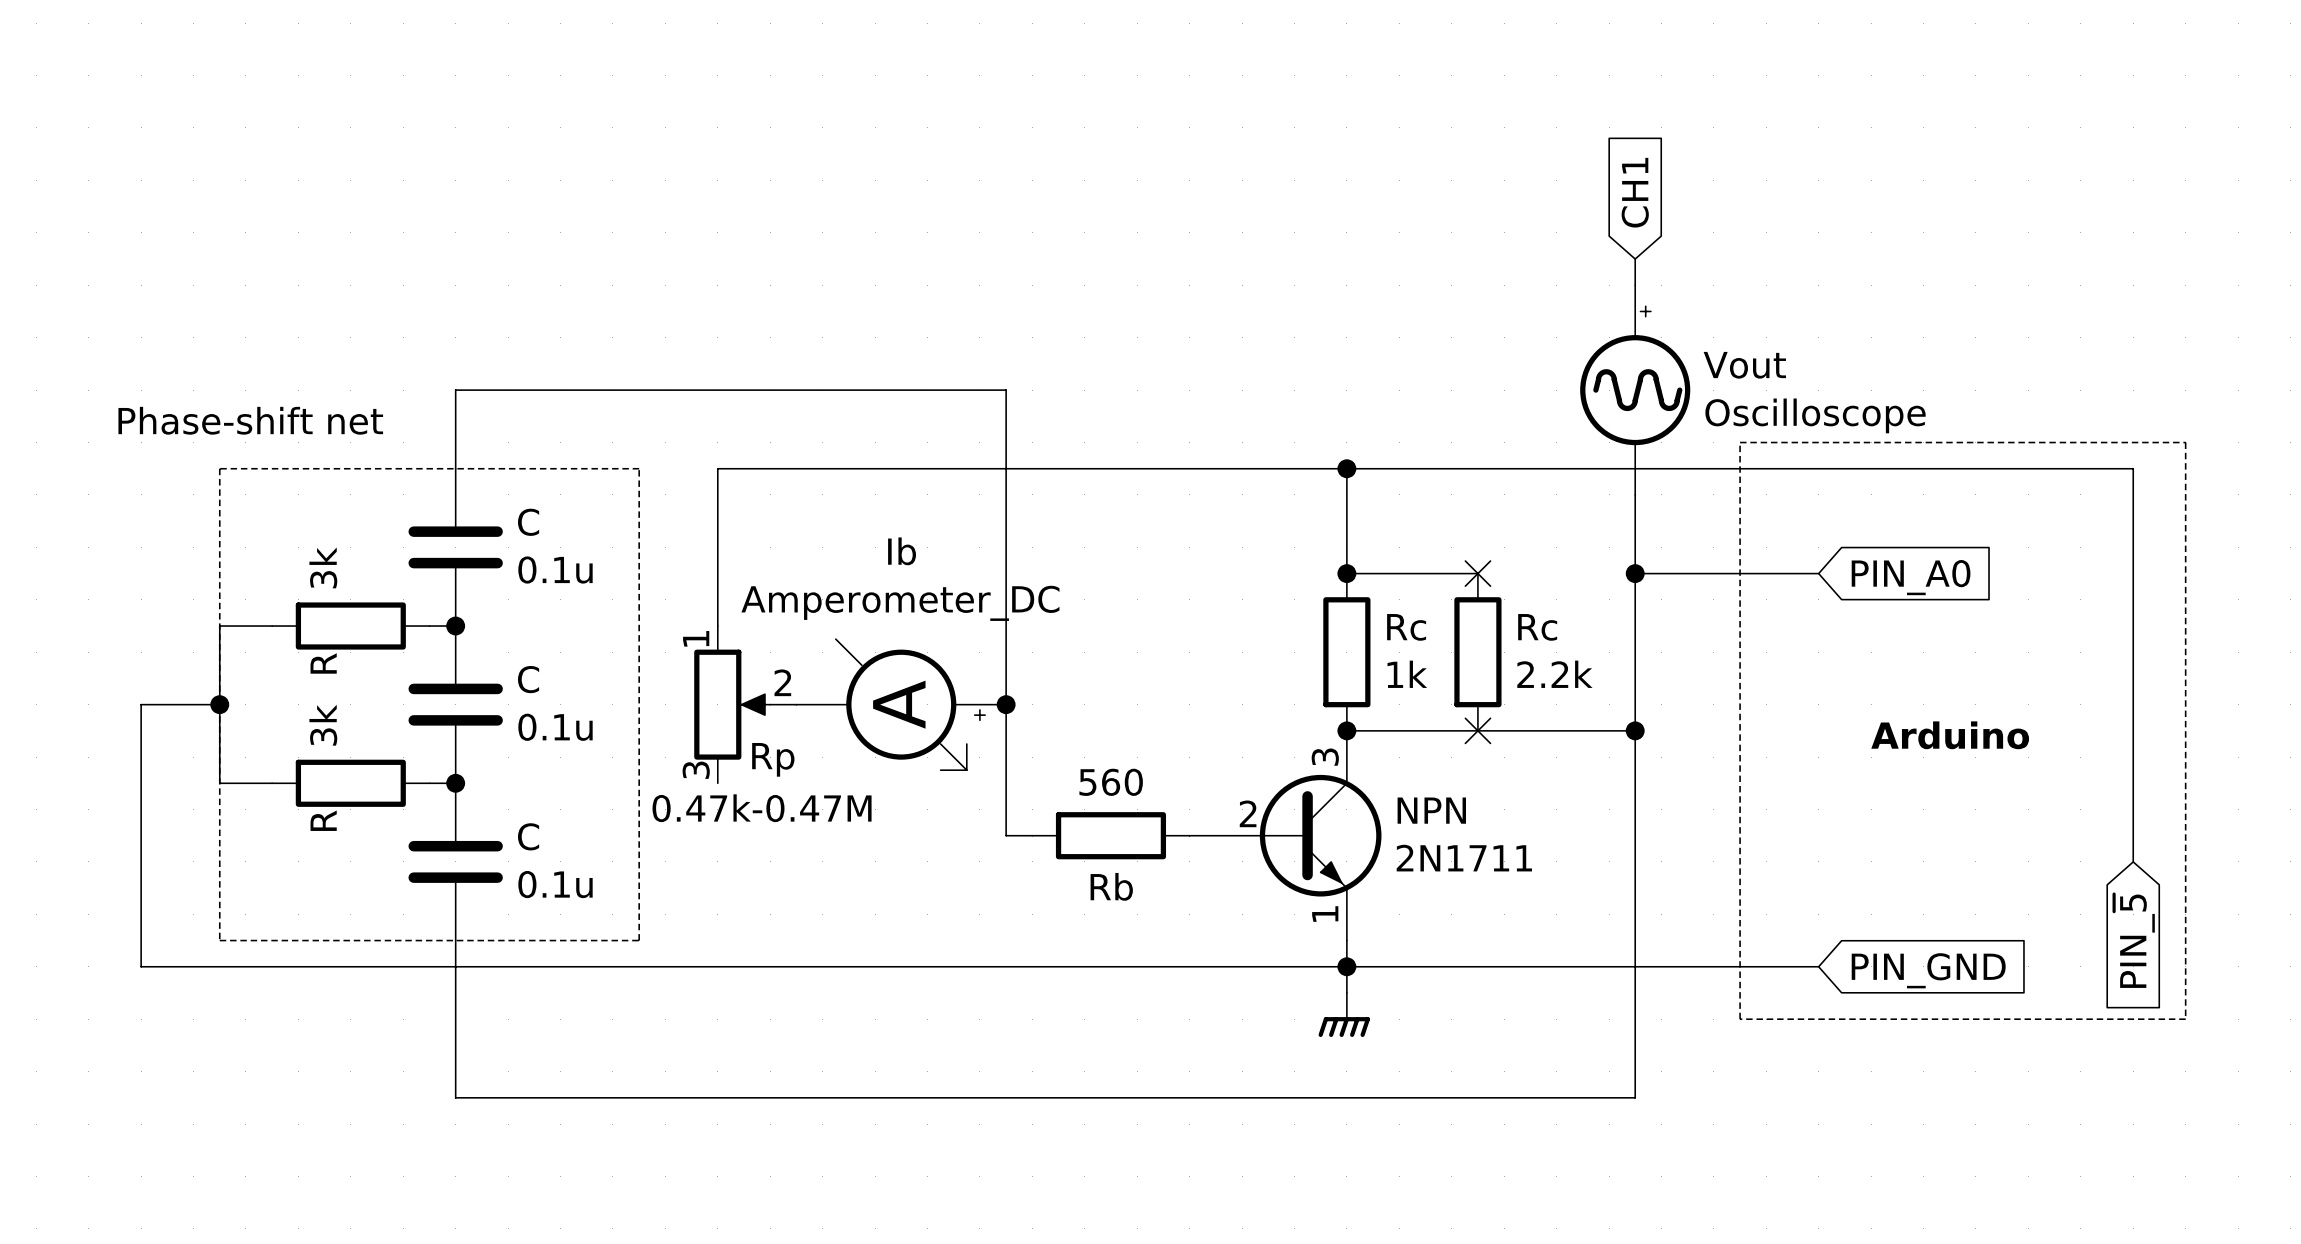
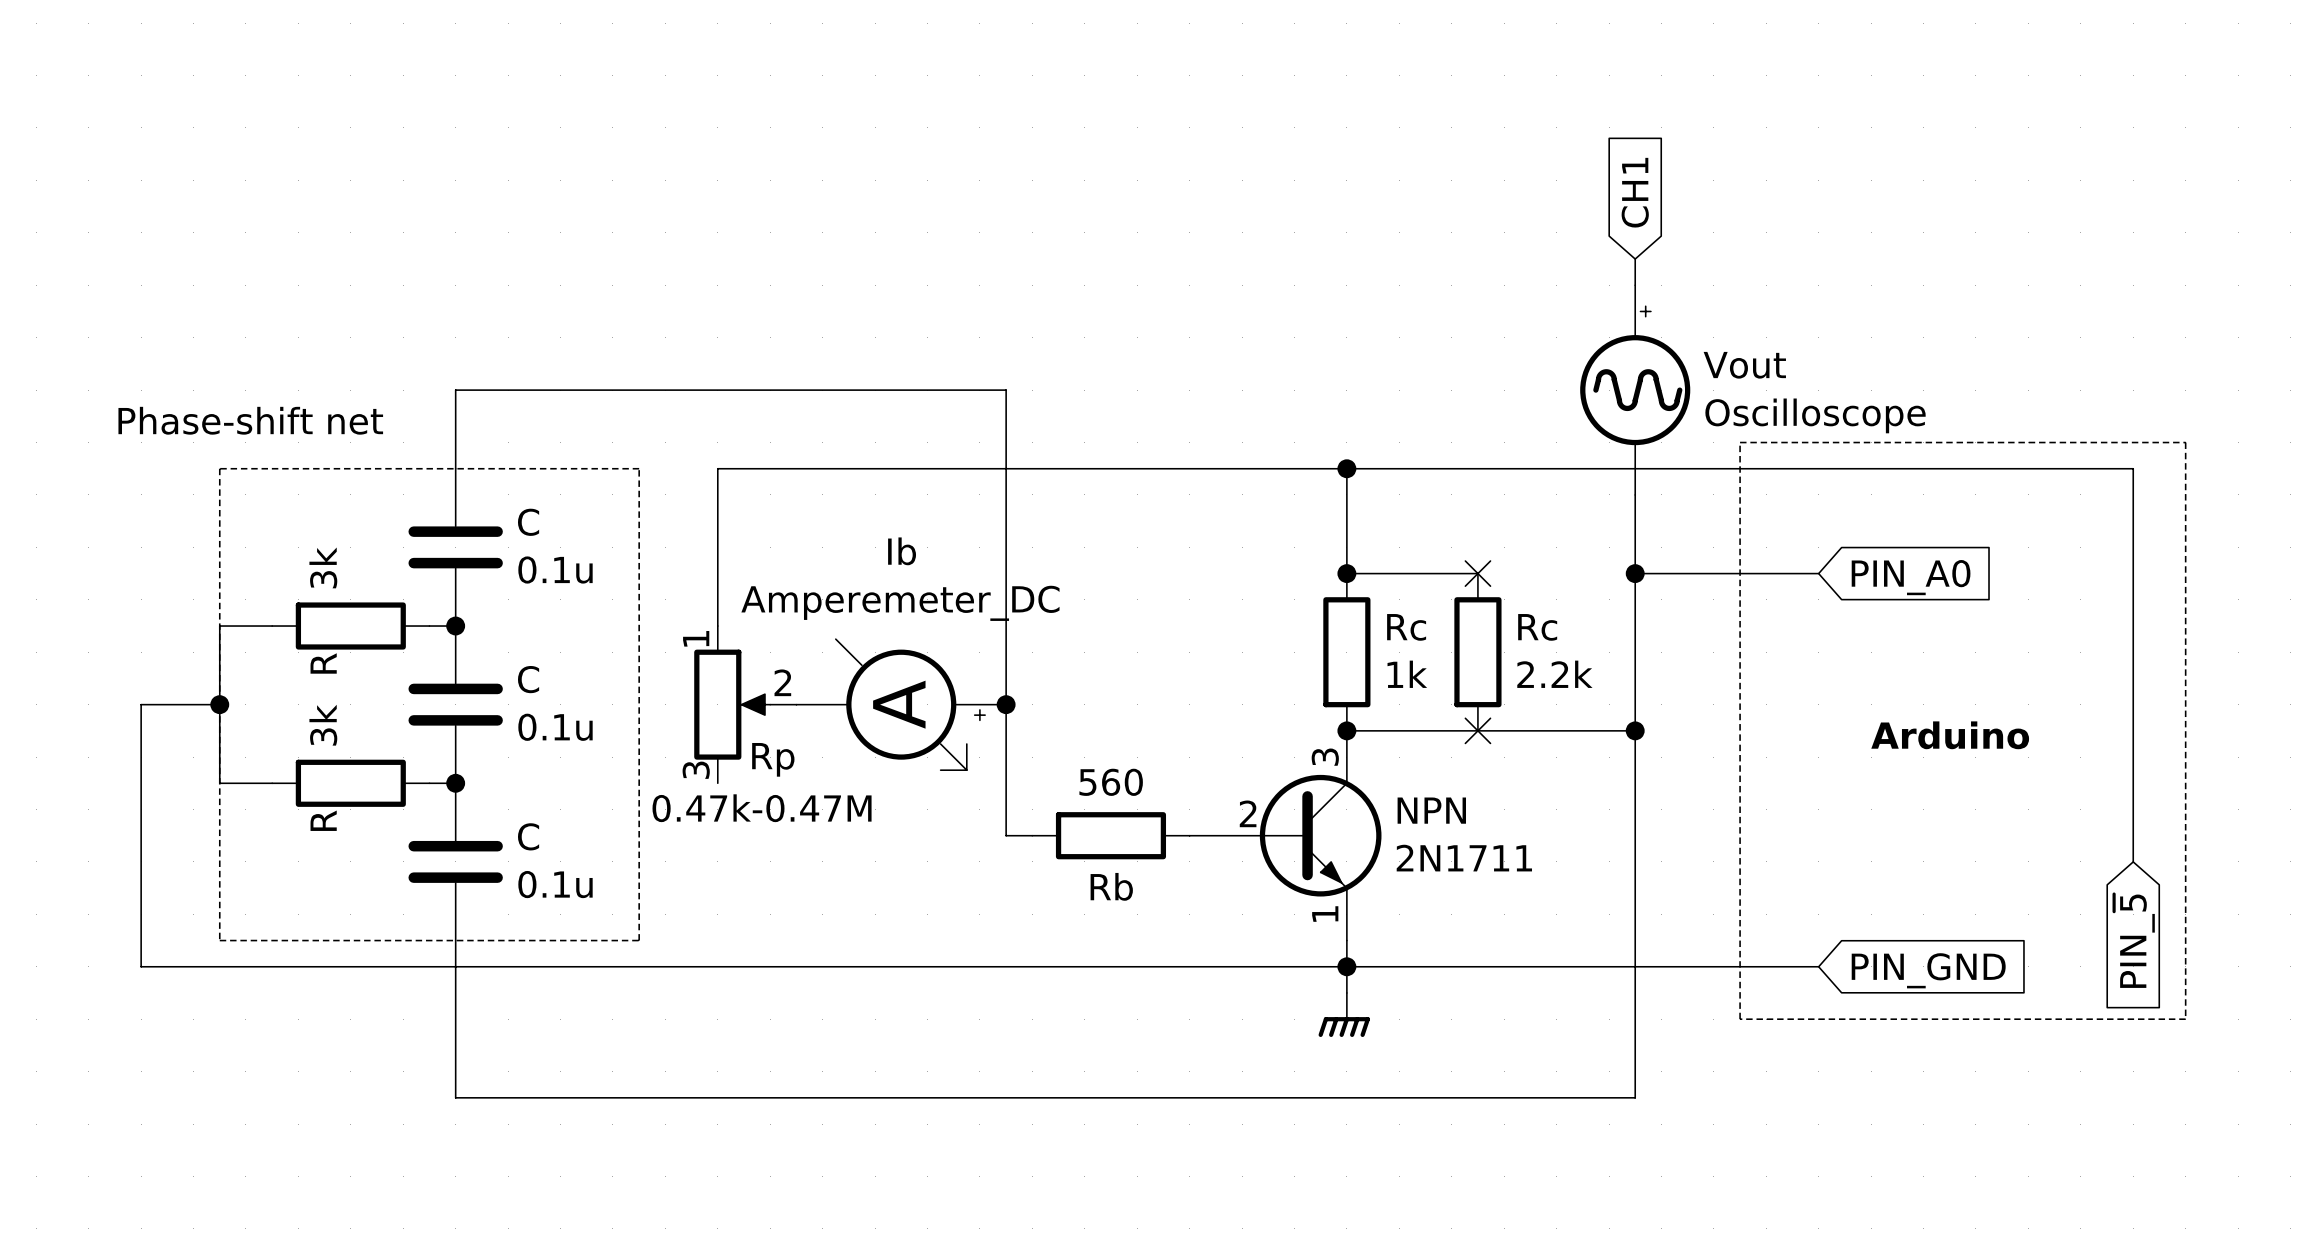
Ib value: Amperometer_DC (900, 603) -> Amperemeter_DC (900, 603)

